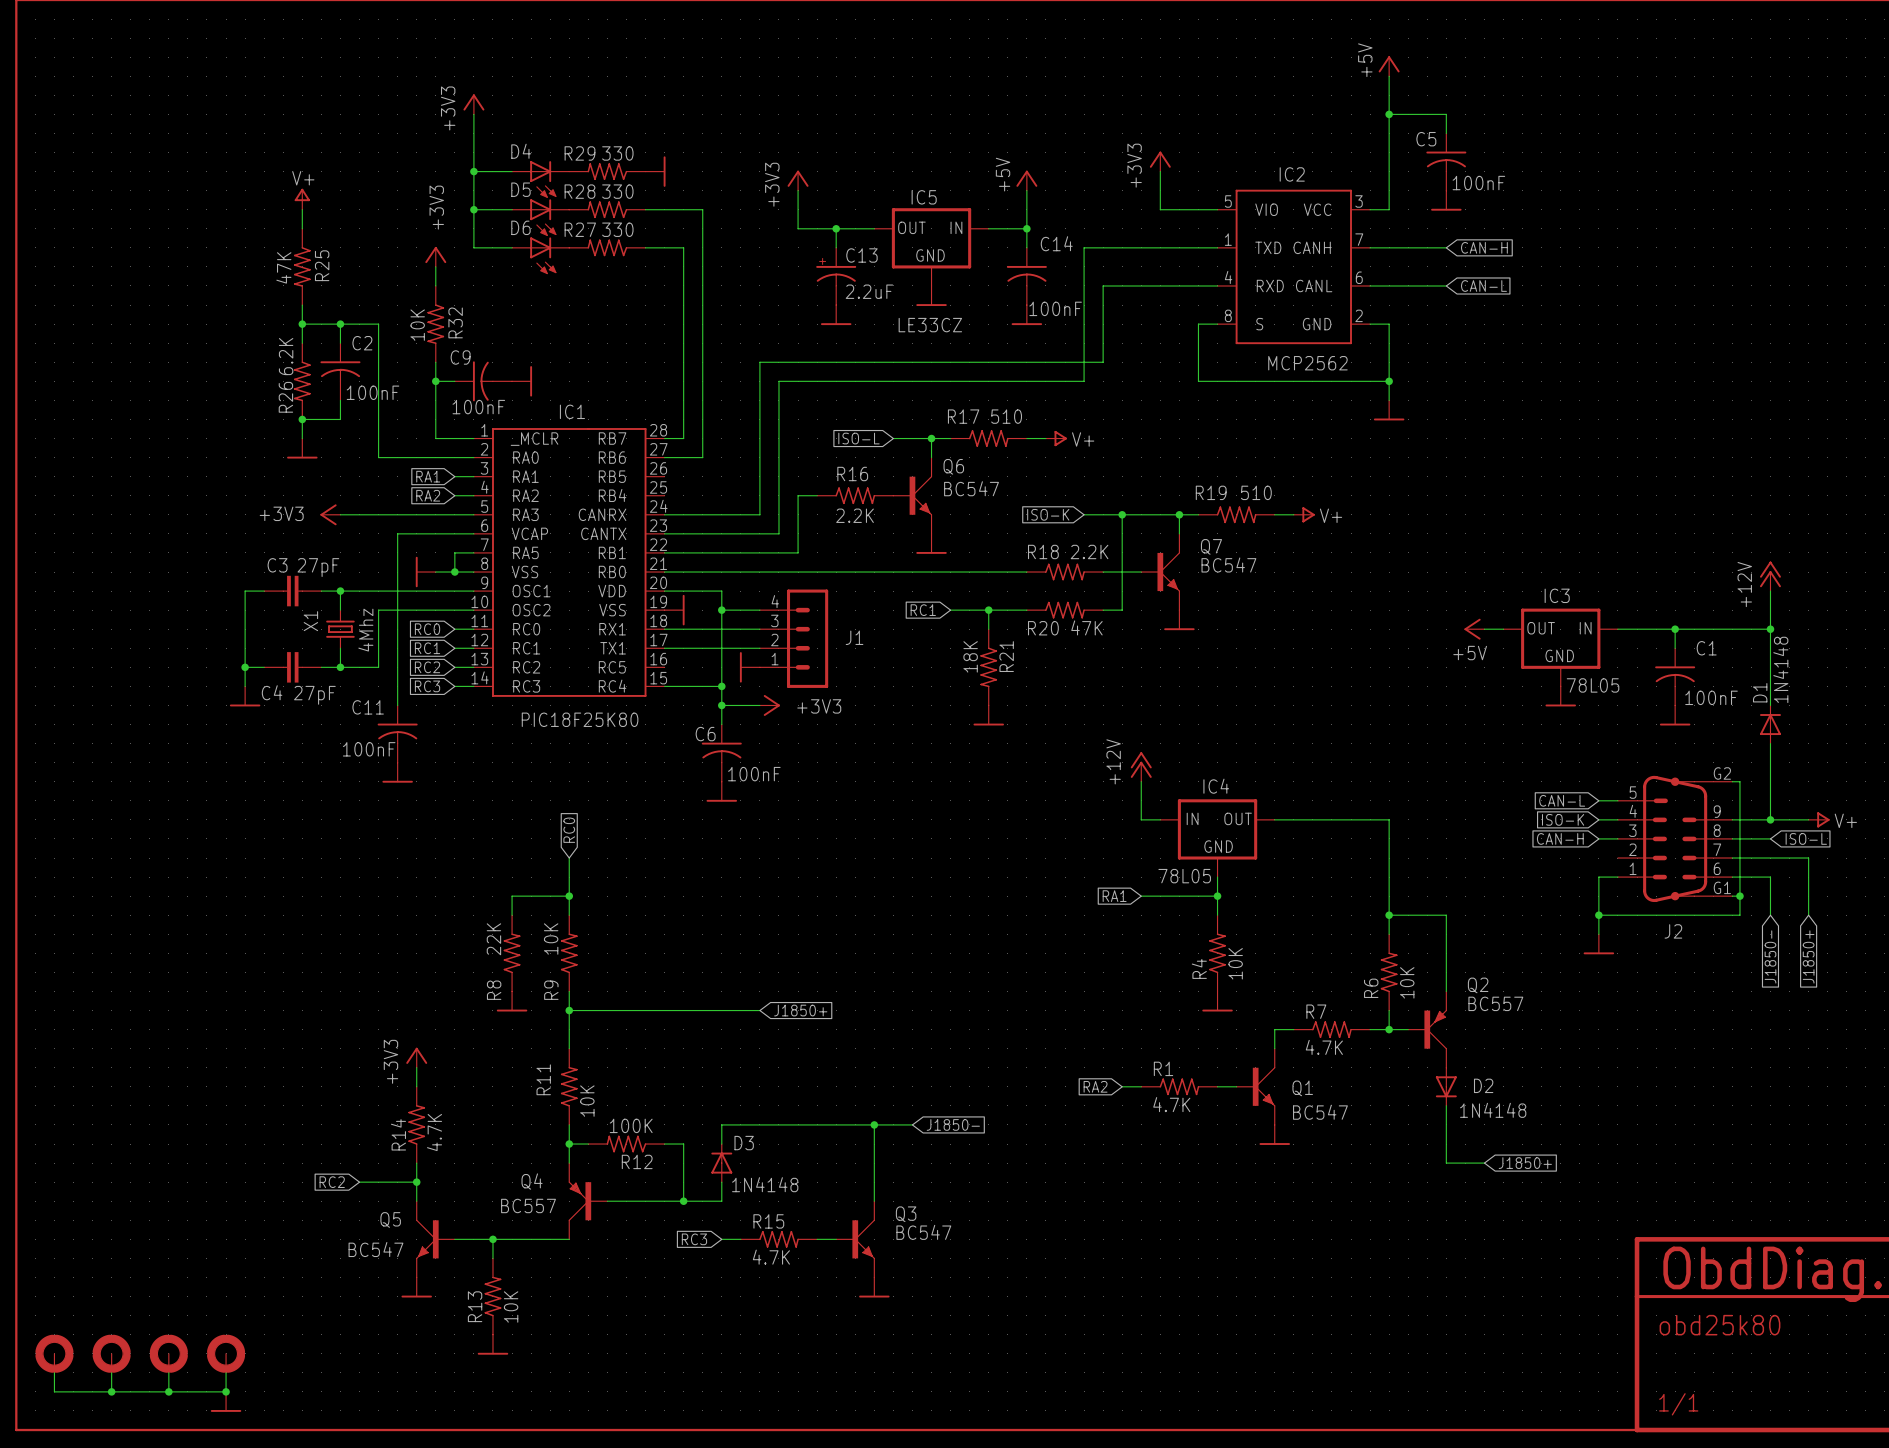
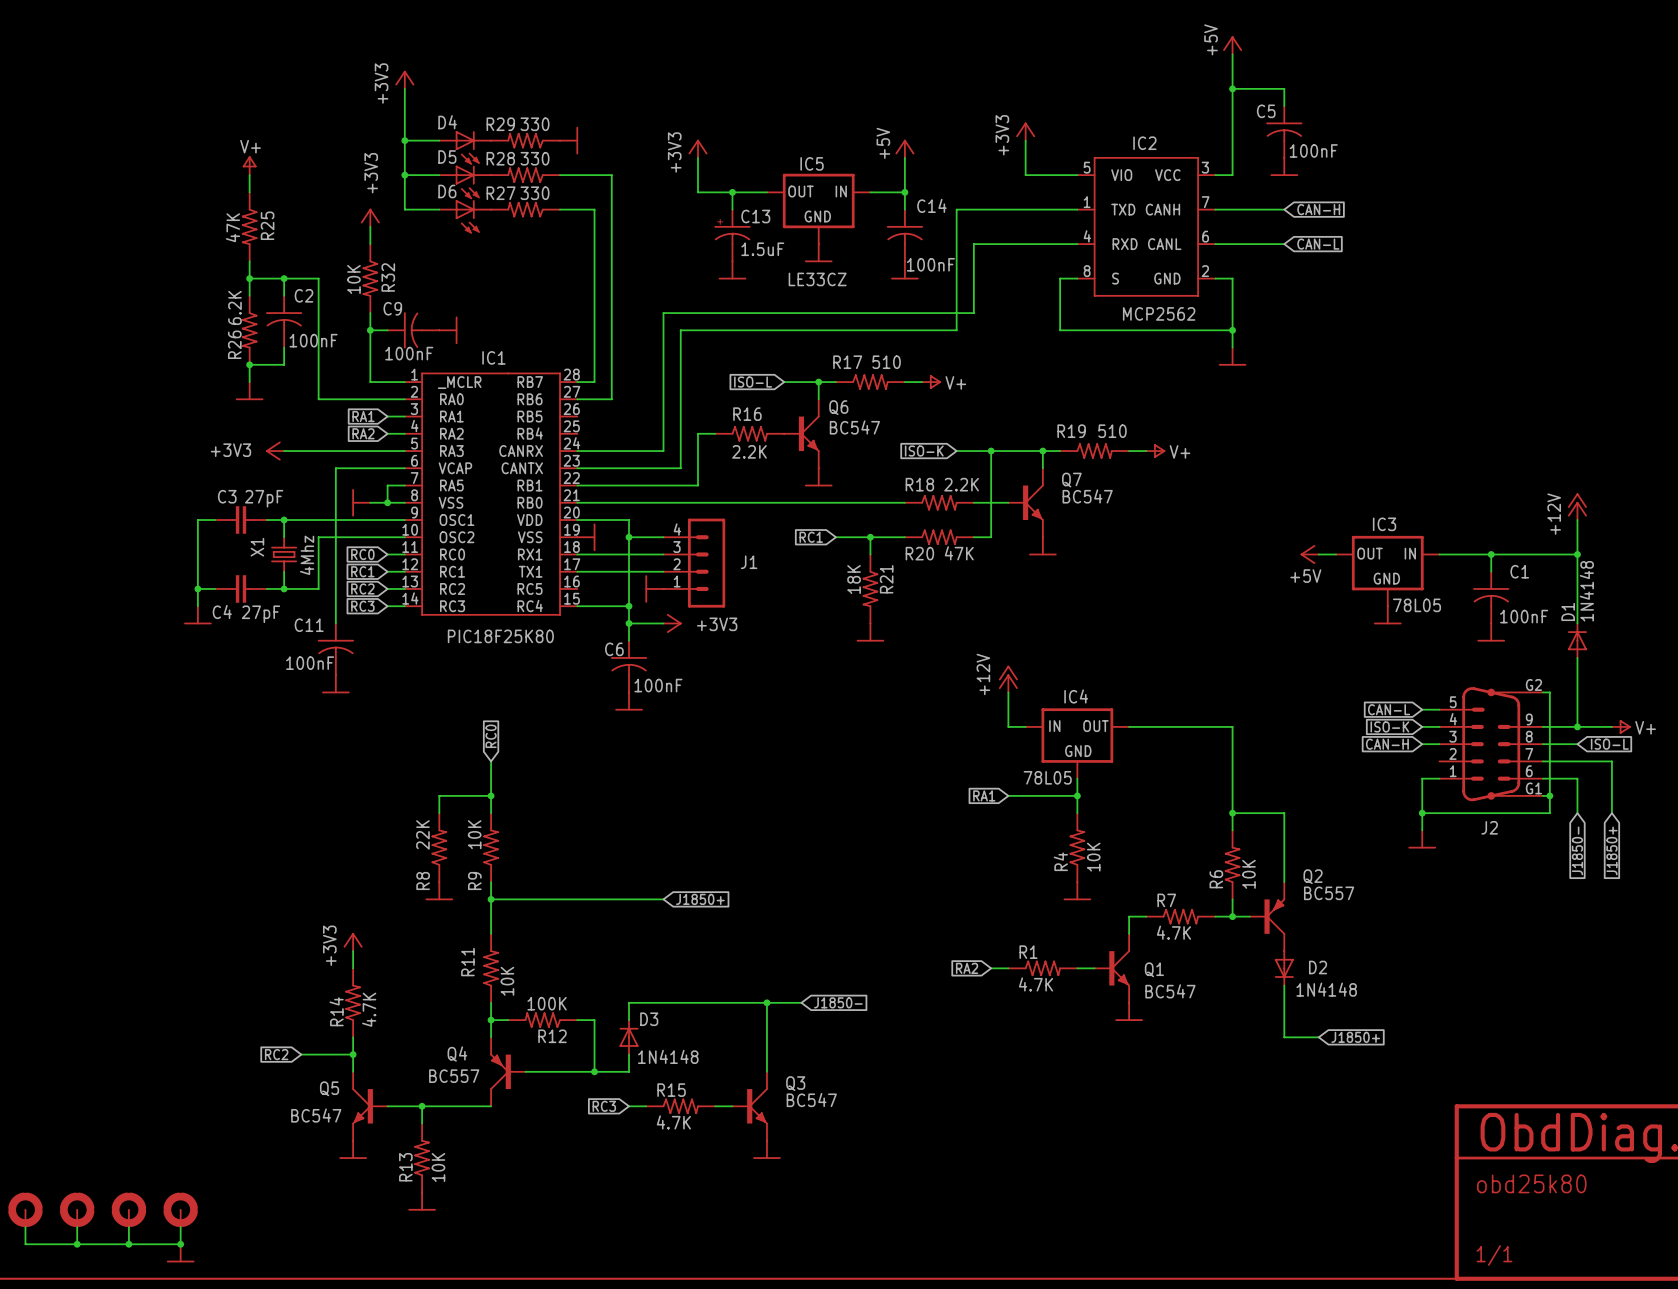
C13 value: 2.2uF (869, 291) -> 1.5uF (762, 249)

